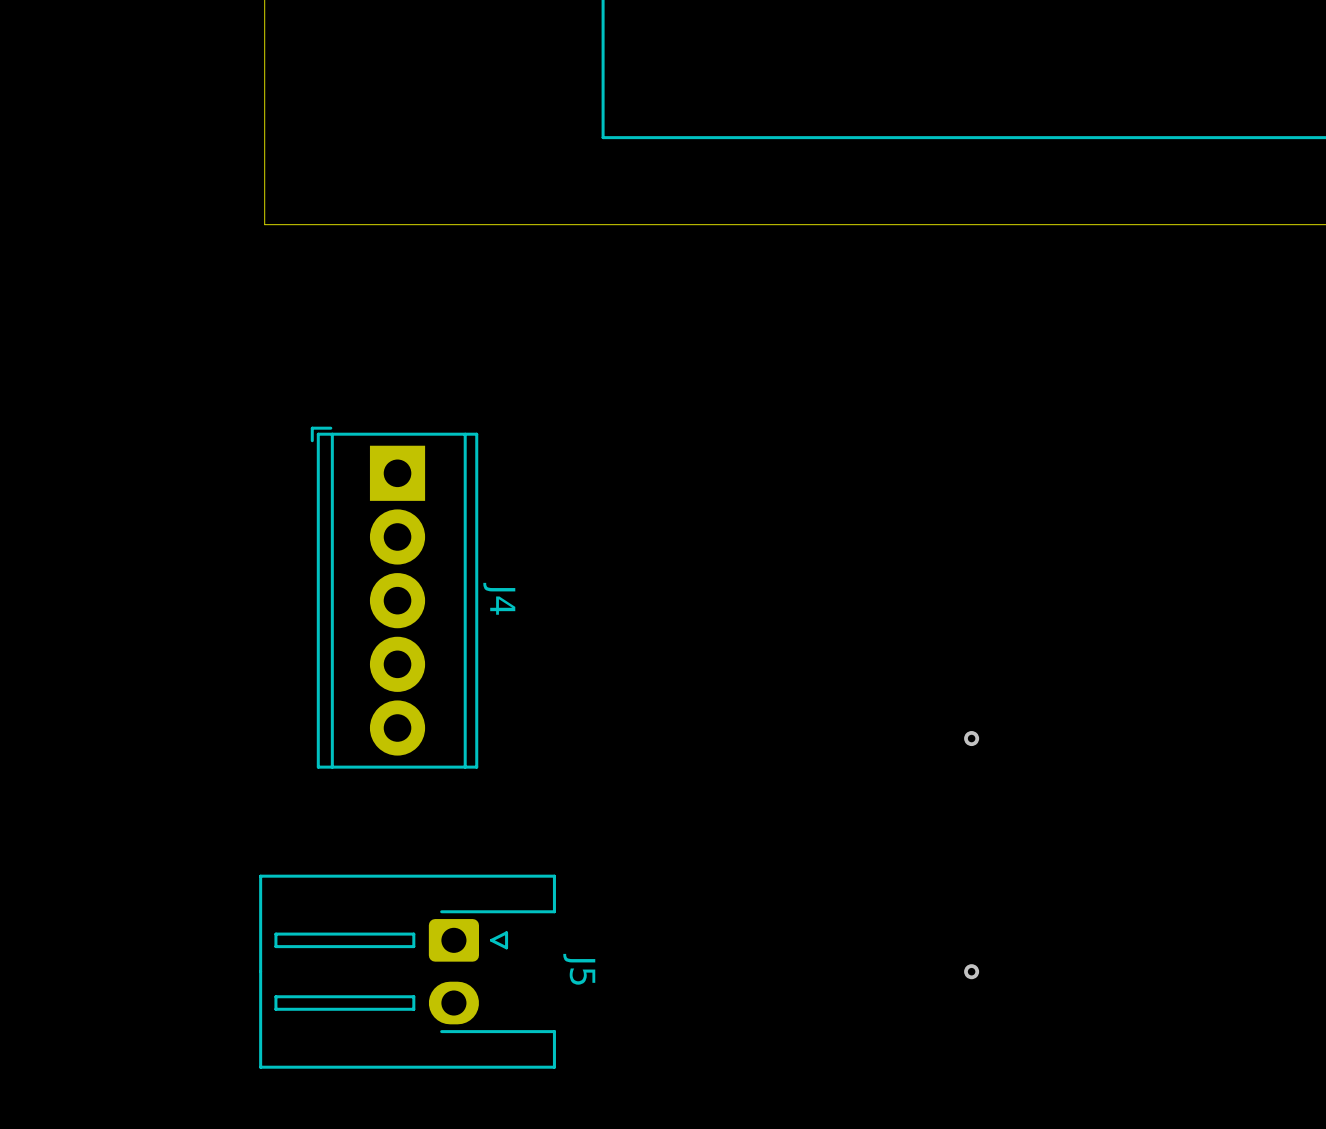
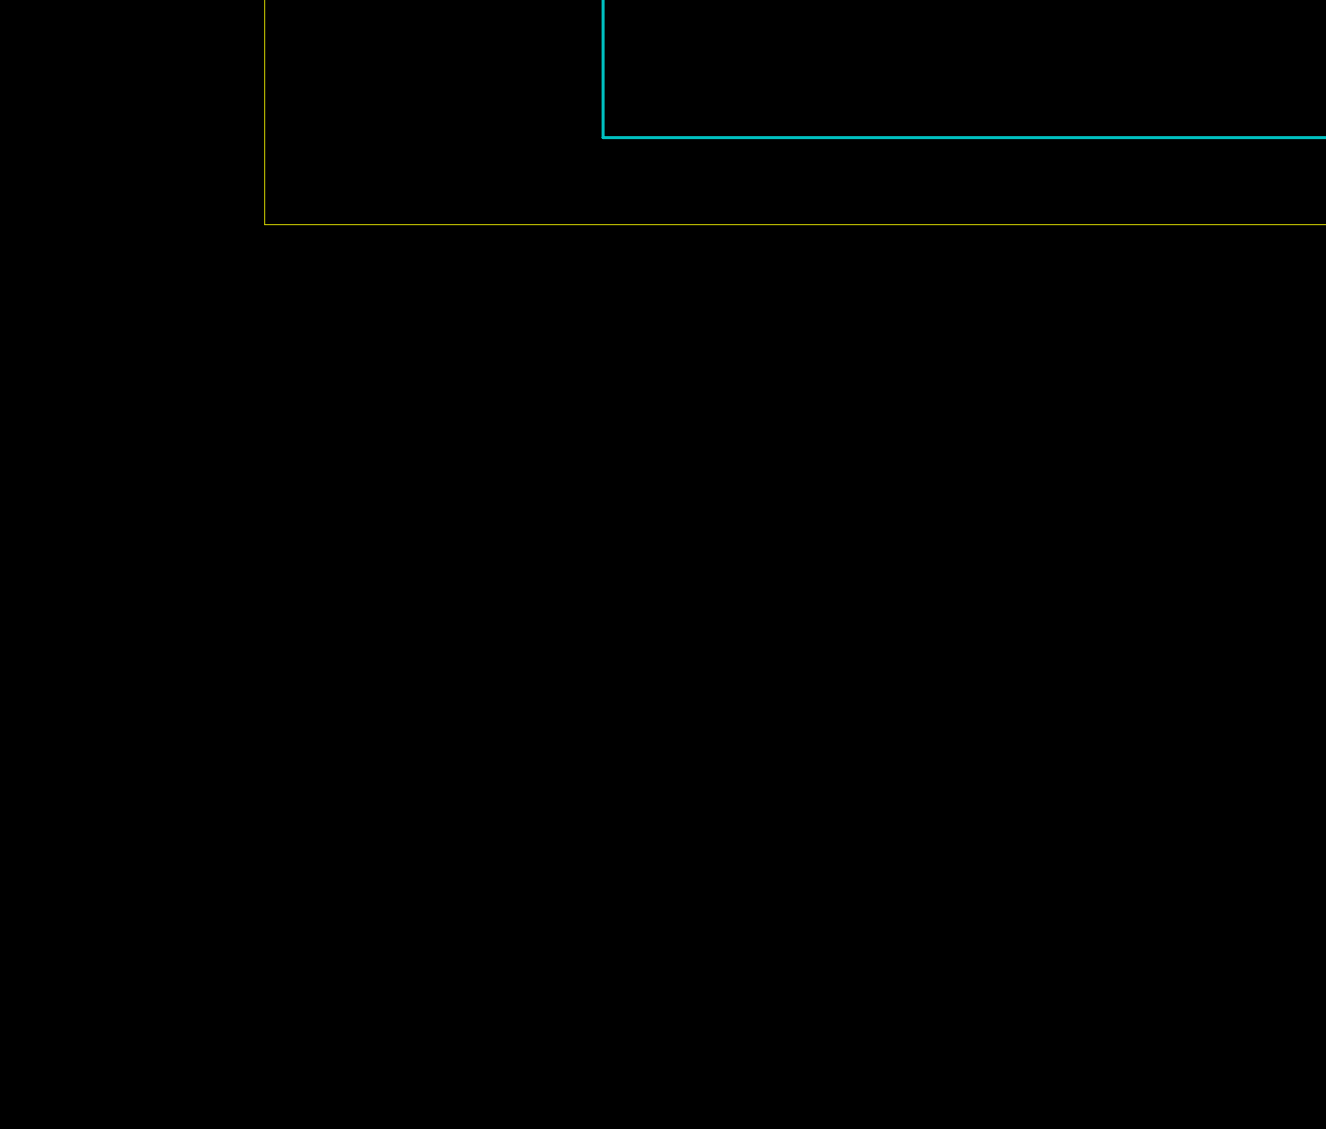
J4: (394, 597) -> none
via: (971, 738) -> none
J5: (407, 971) -> none
via: (971, 971) -> none

